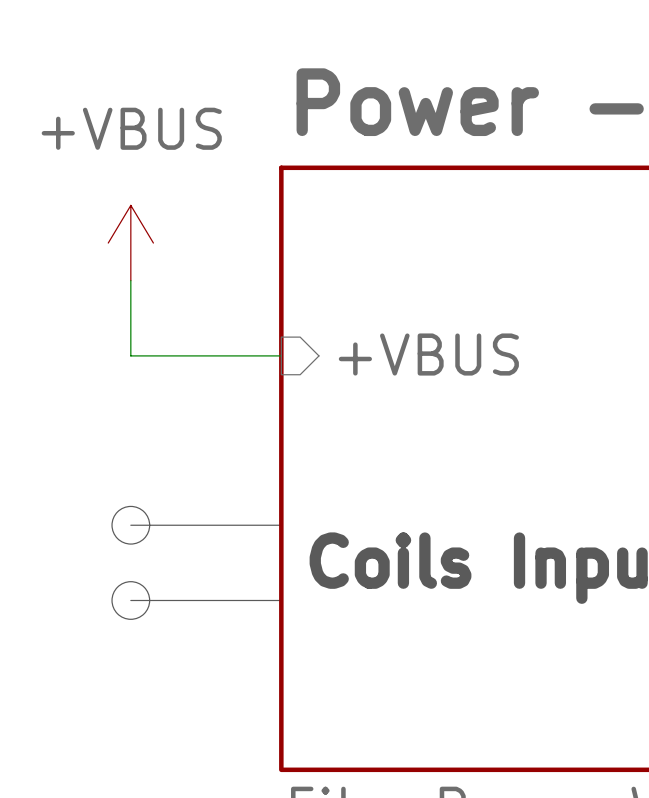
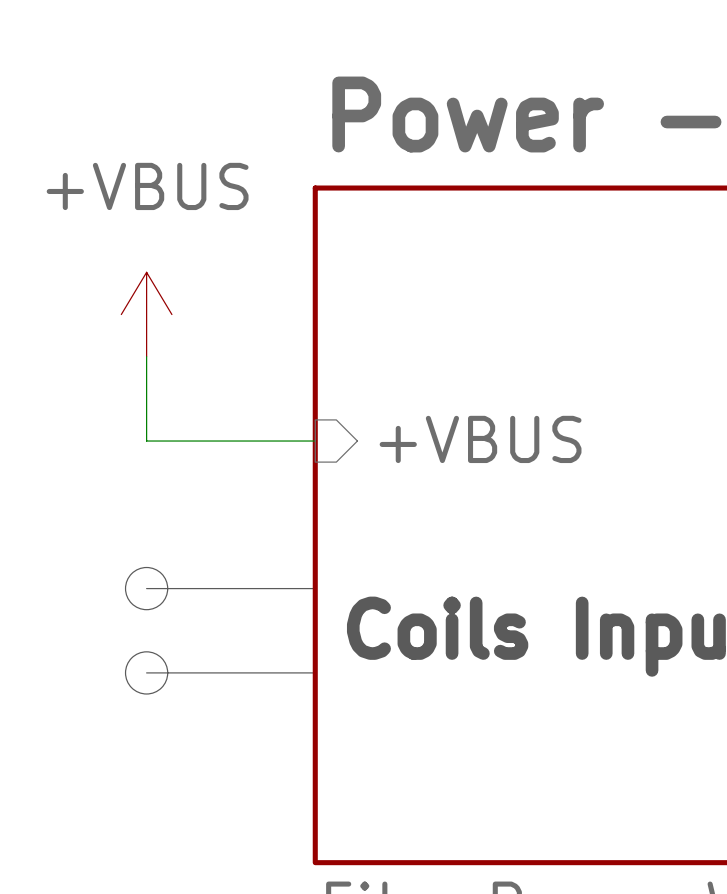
power symbol position: +VBUS (130, 243) -> +VBUS (146, 314)
sheet pin position: +VBUS (428, 354) -> +VBUS (480, 439)
wire: (130, 355) (281, 355) -> (146, 398) (146, 441) (315, 441)

